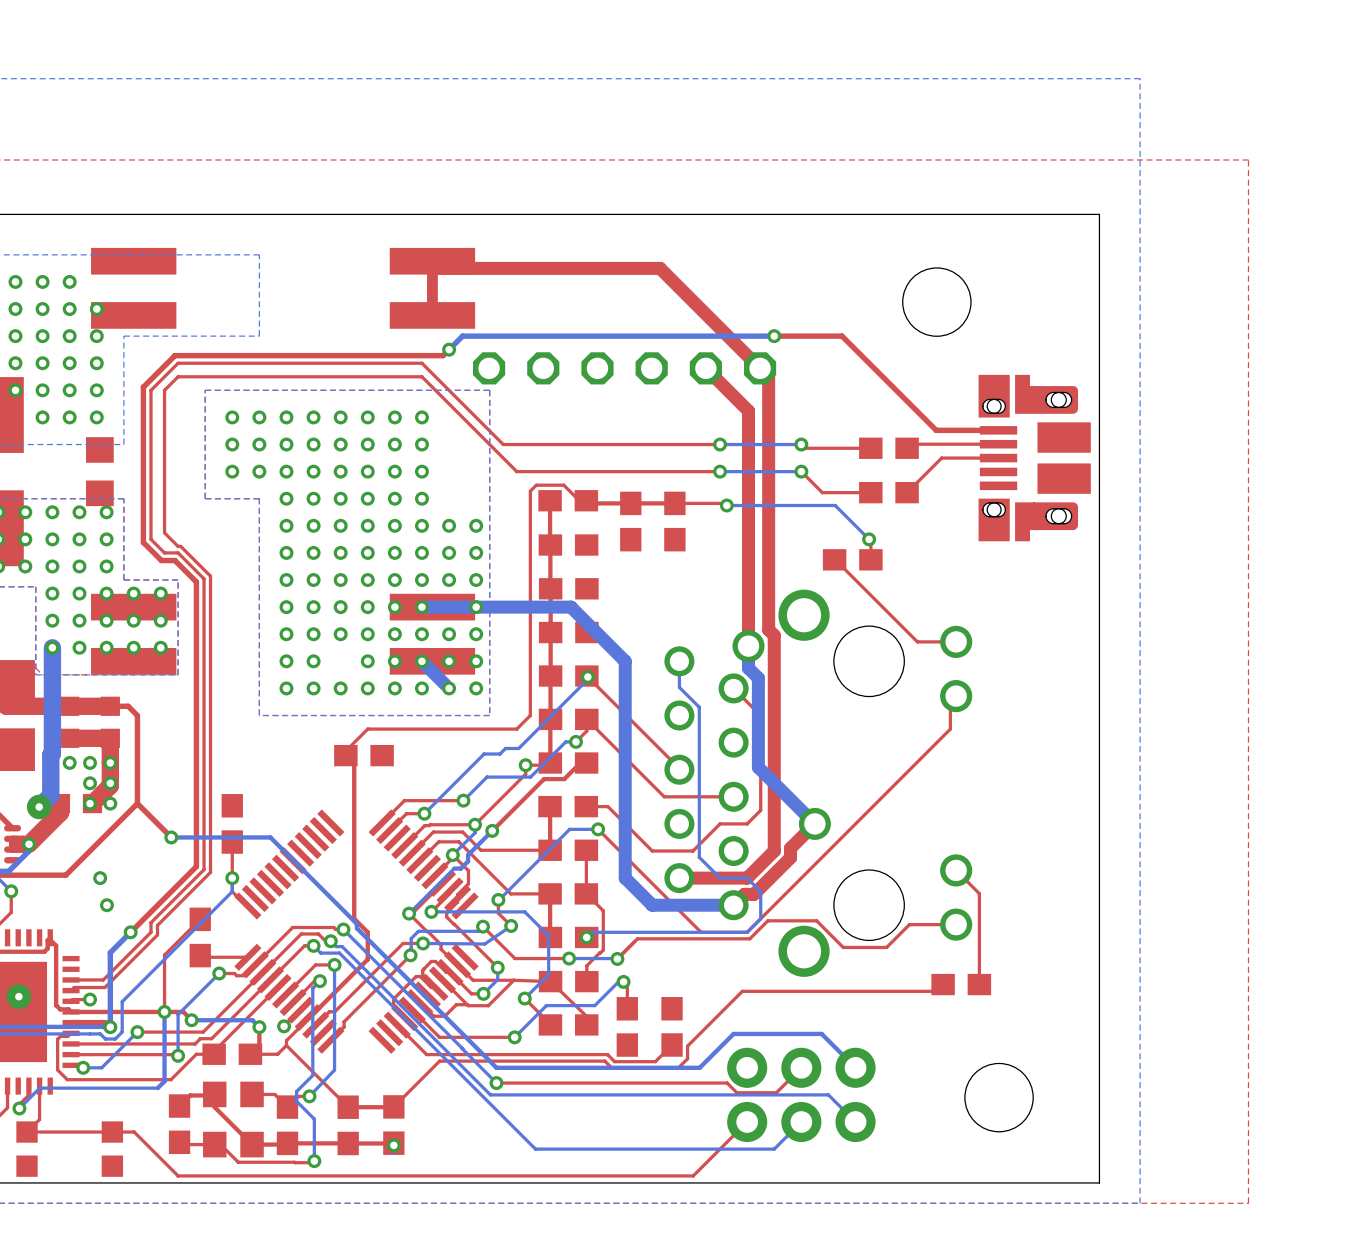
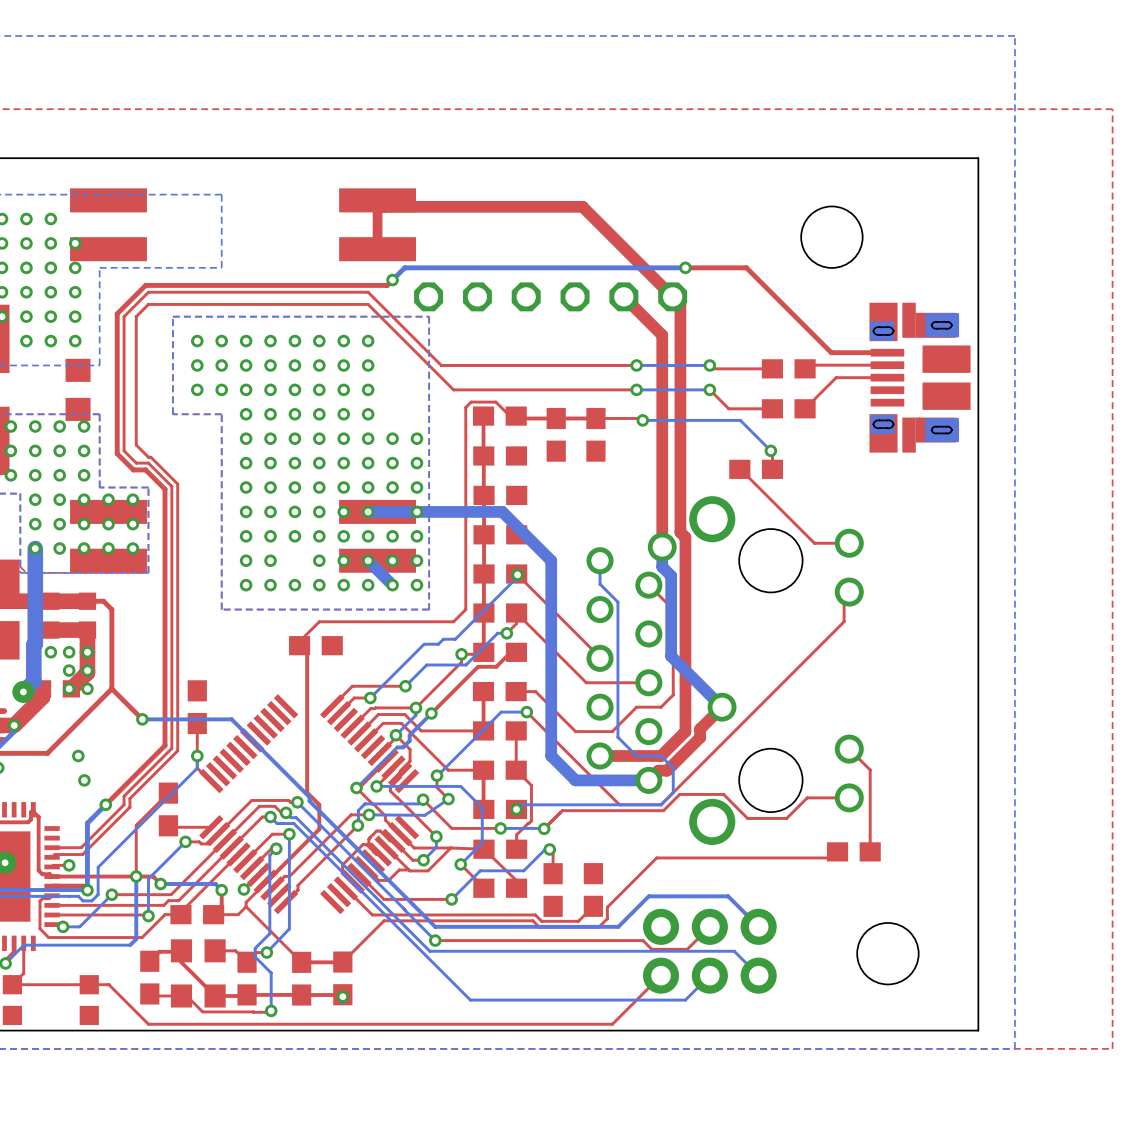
part footprint: [978, 374, 1091, 542] -> [869, 302, 971, 453]

